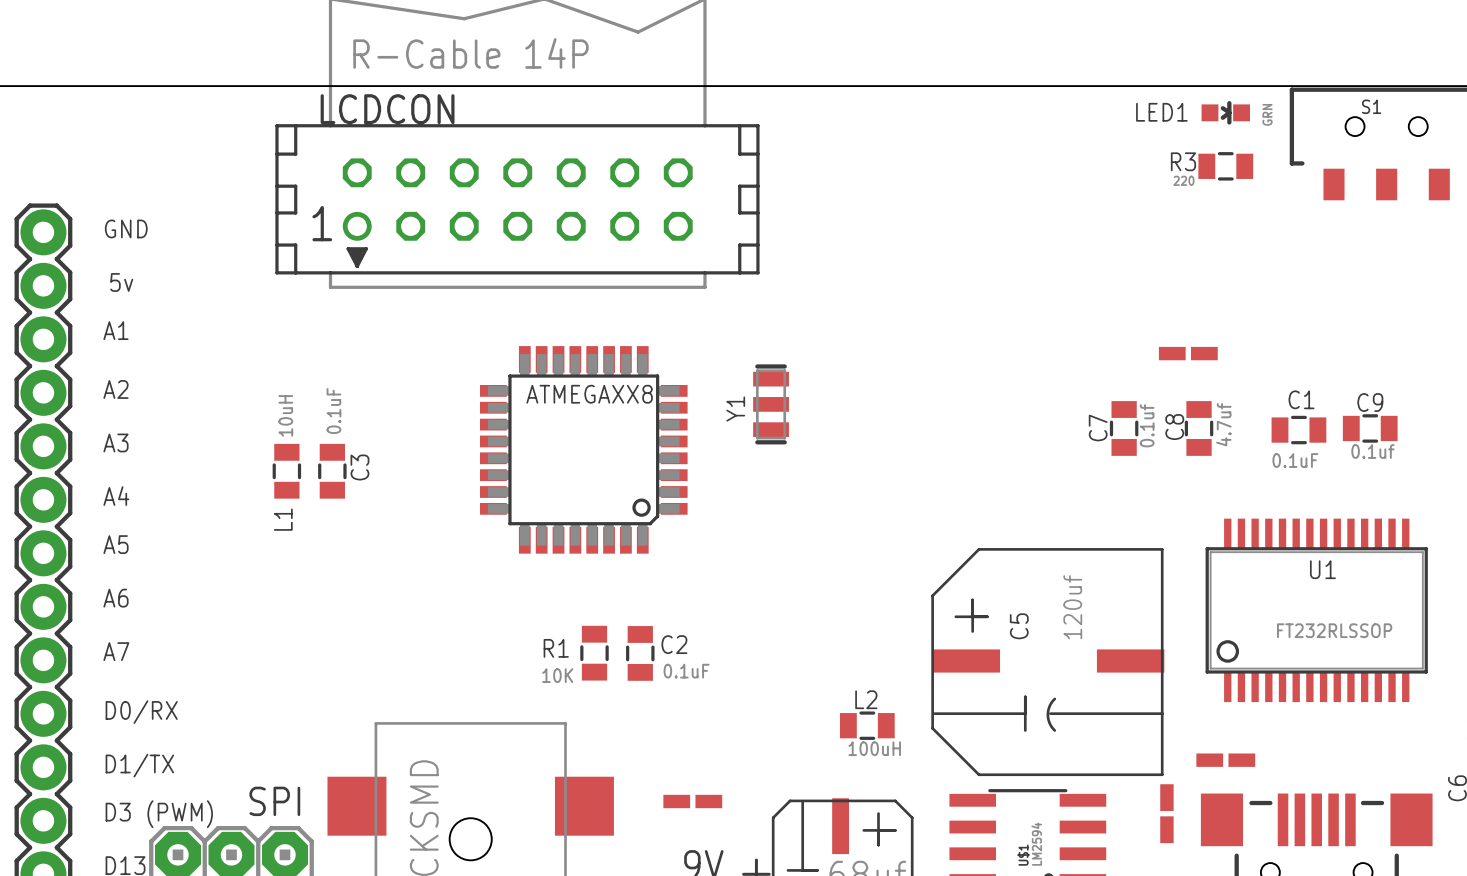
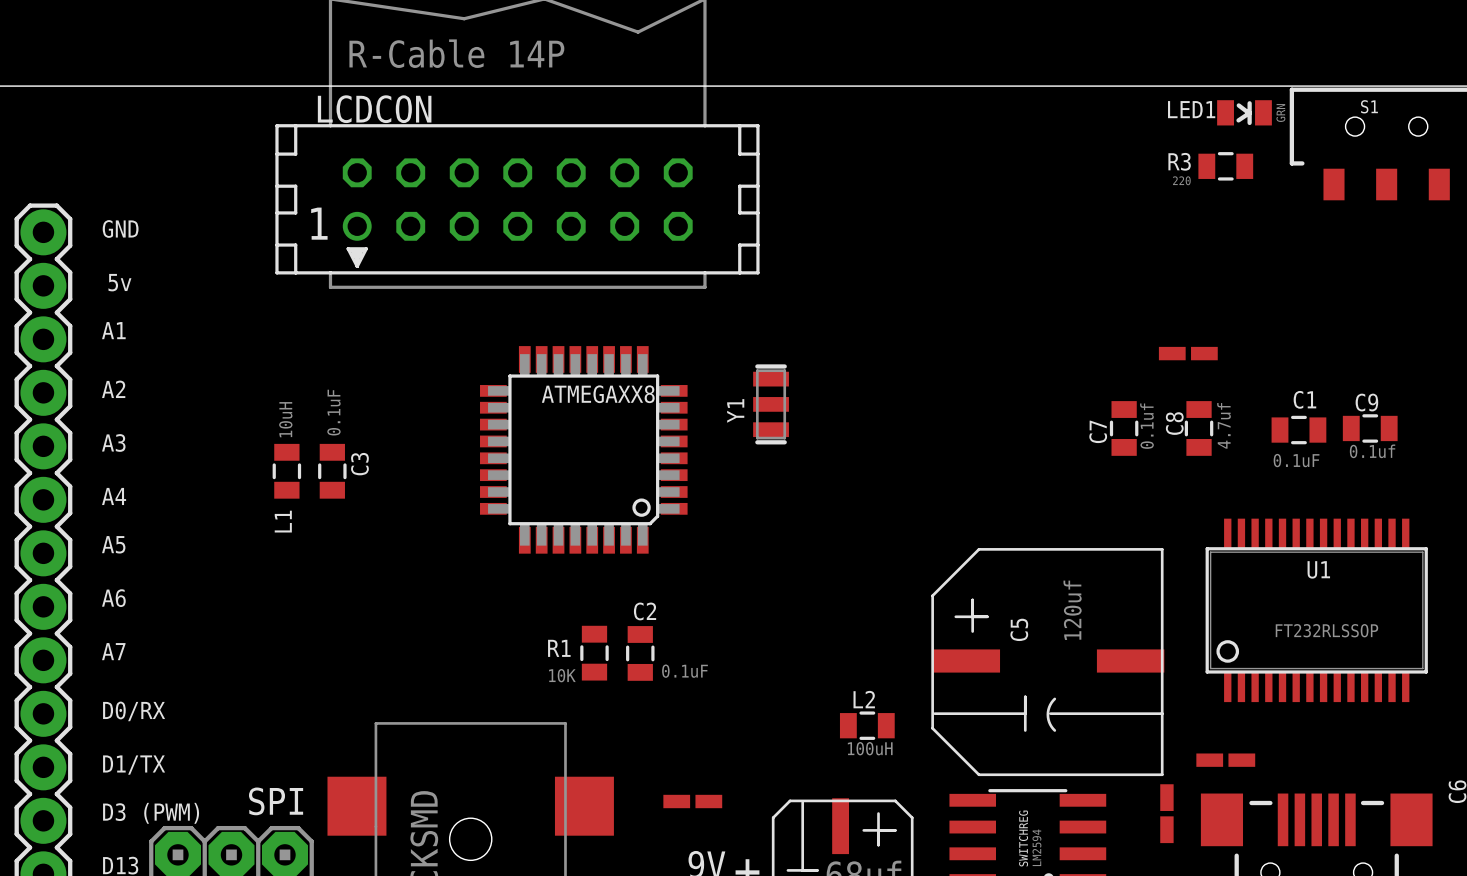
LED1 footprint: [1201, 101, 1251, 125] -> [1217, 100, 1272, 126]
C2 name position: C2 (674, 644) -> C2 (645, 611)
U$1 name: U$1 (1023, 855) -> SWITCHREG (1023, 838)

